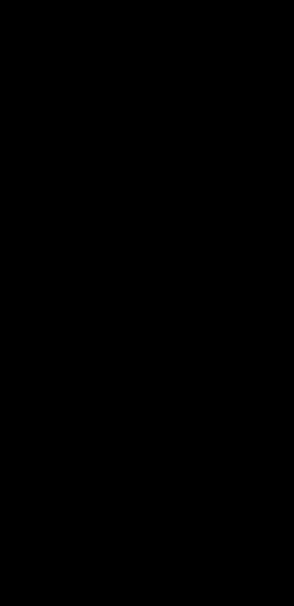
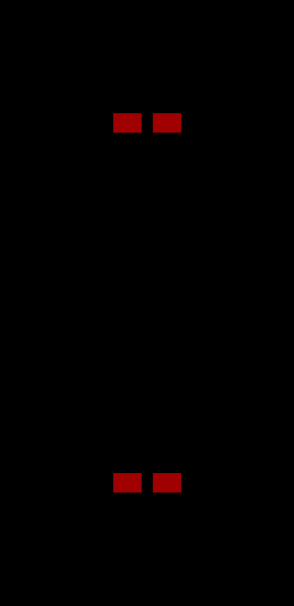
part: none -> (147, 122)
part: none -> (147, 482)

